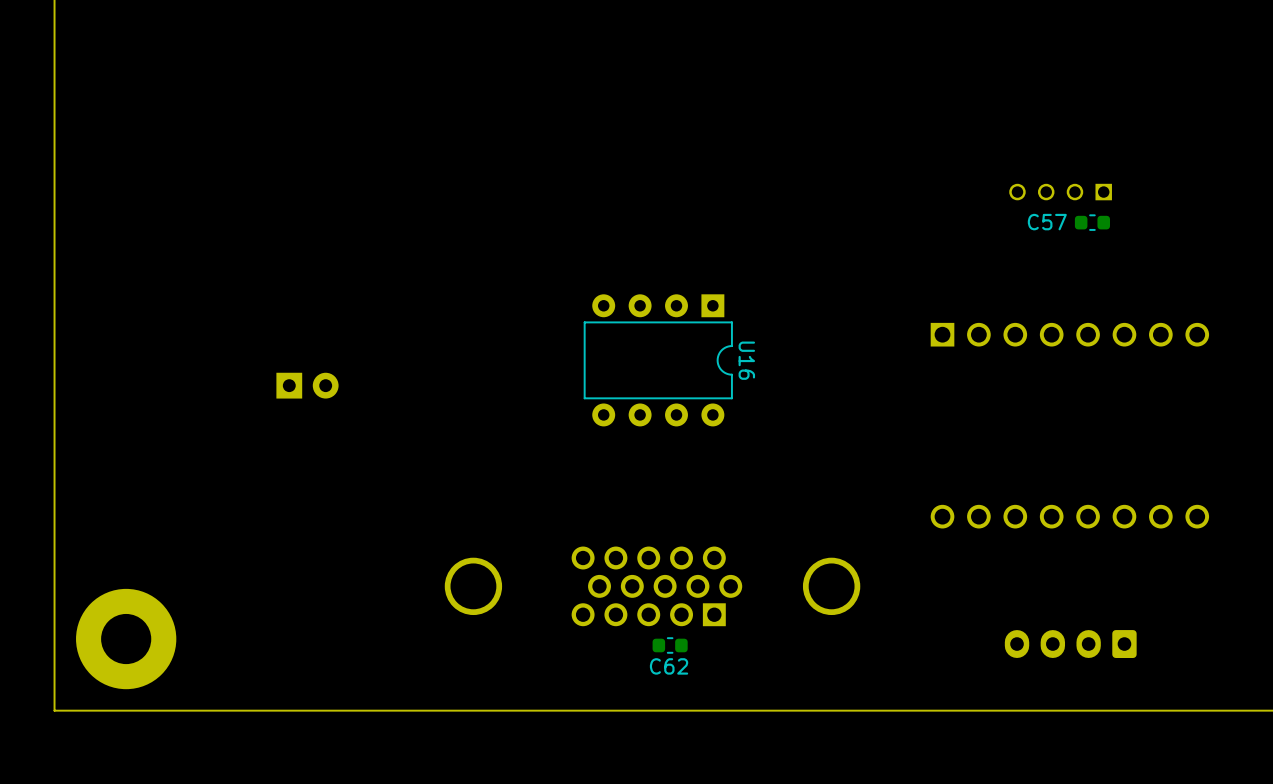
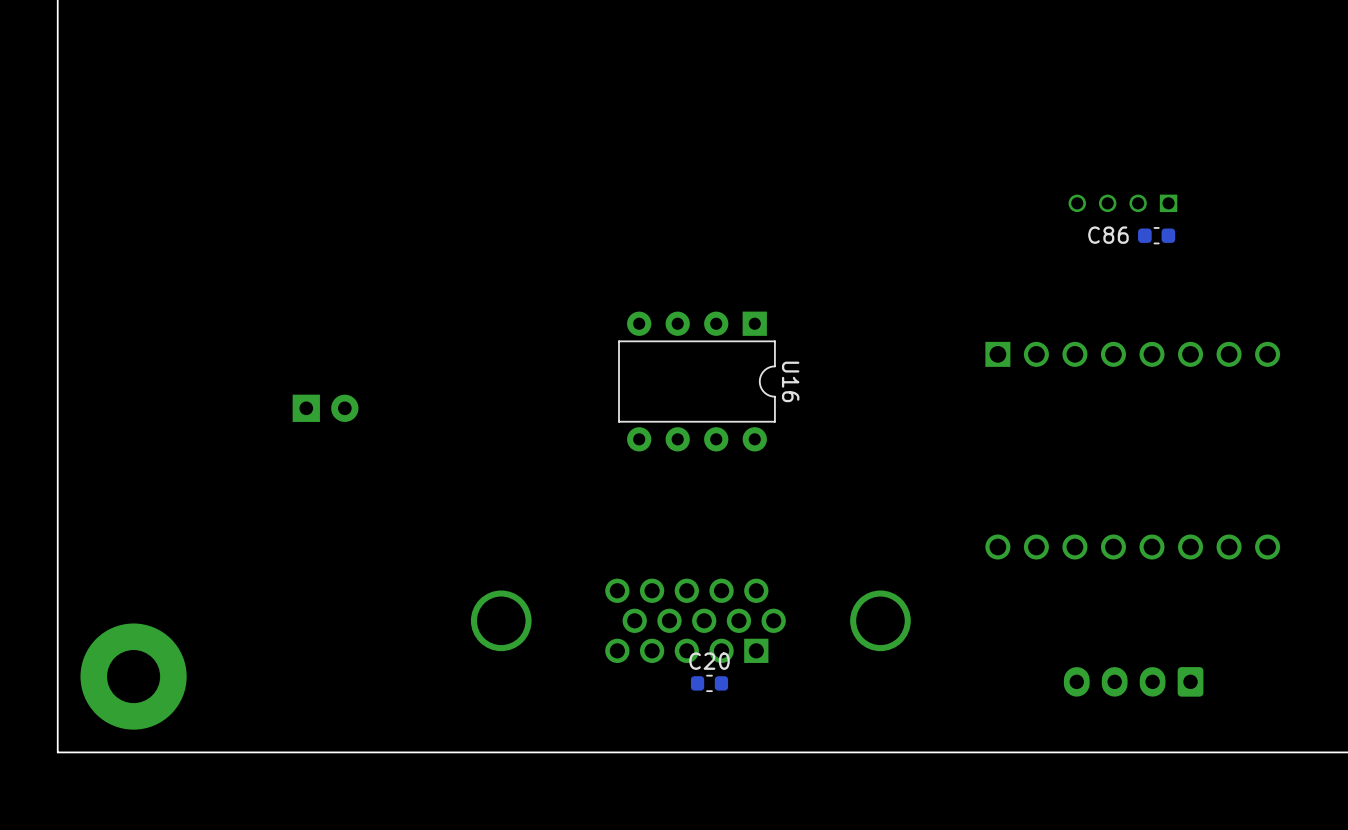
C57: (1092, 222) -> none
C86: none -> (1156, 235)
C62 name: C62 (669, 666) -> C20 (709, 661)

